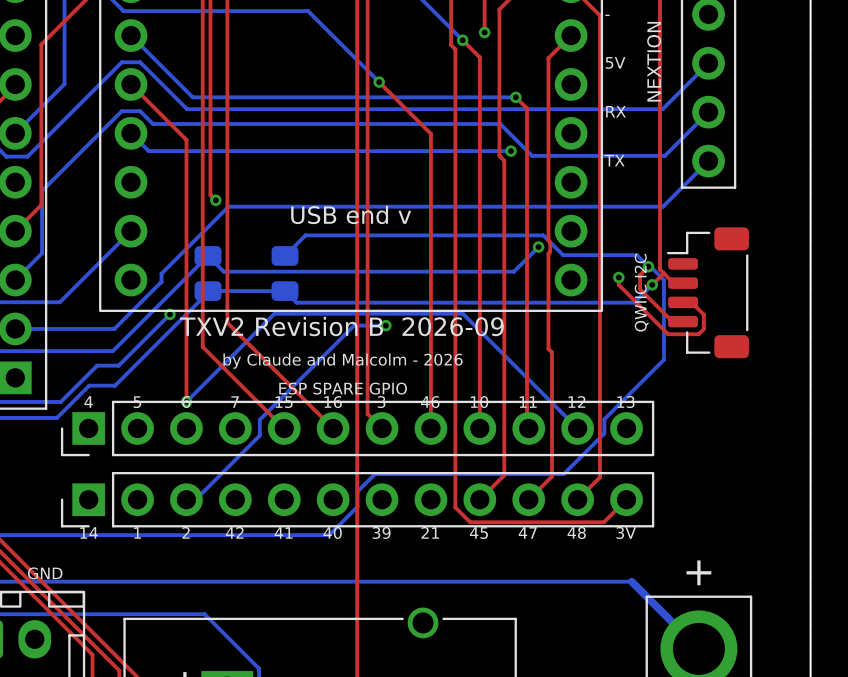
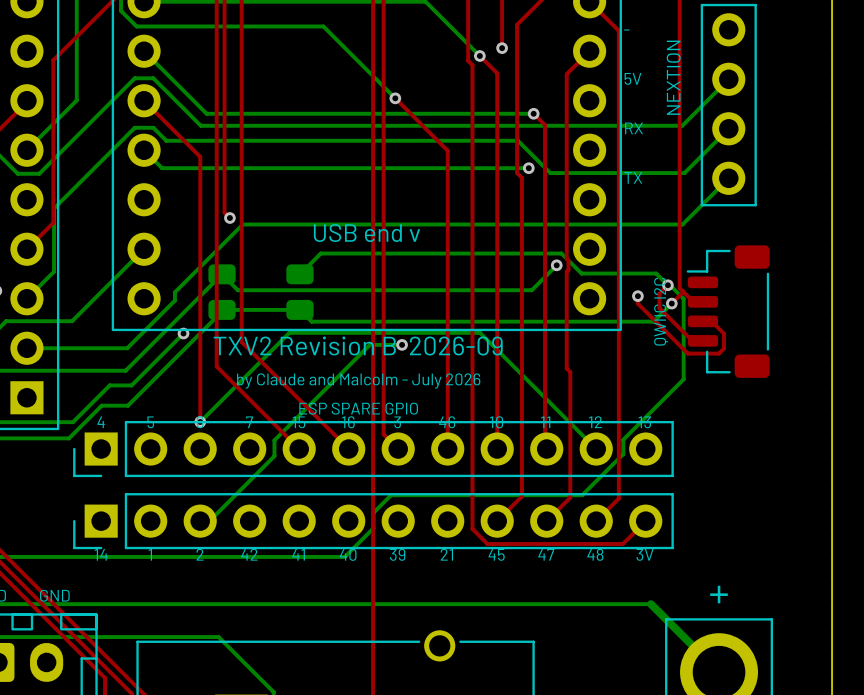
text: by Claude and Malcolm - 2026 (342, 361) -> by Claude and Malcolm - July 2026 (358, 380)

